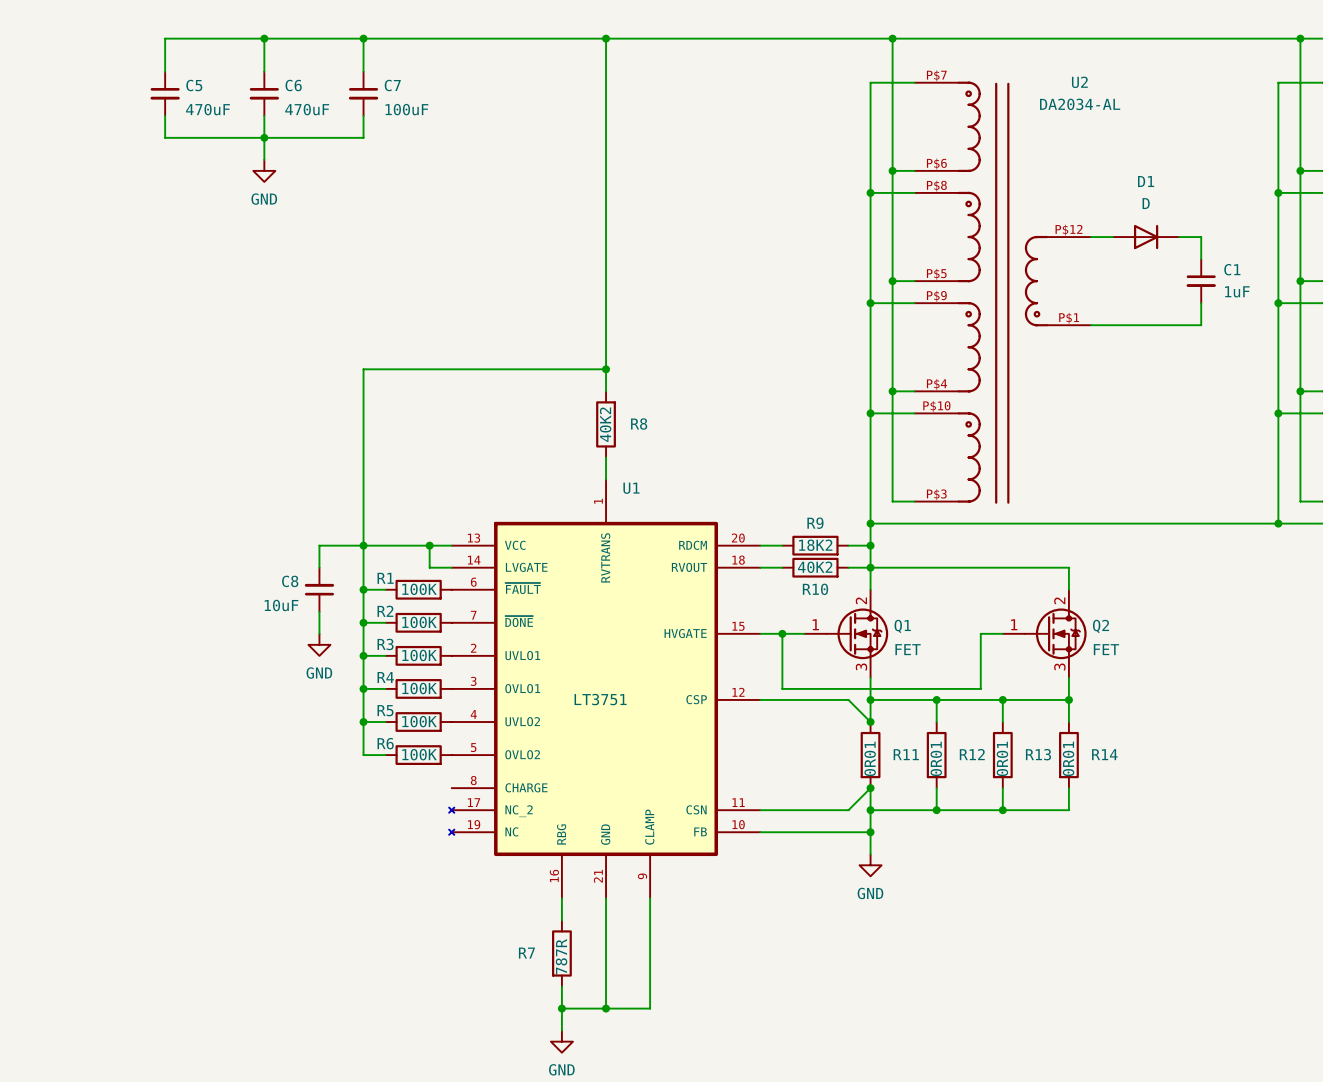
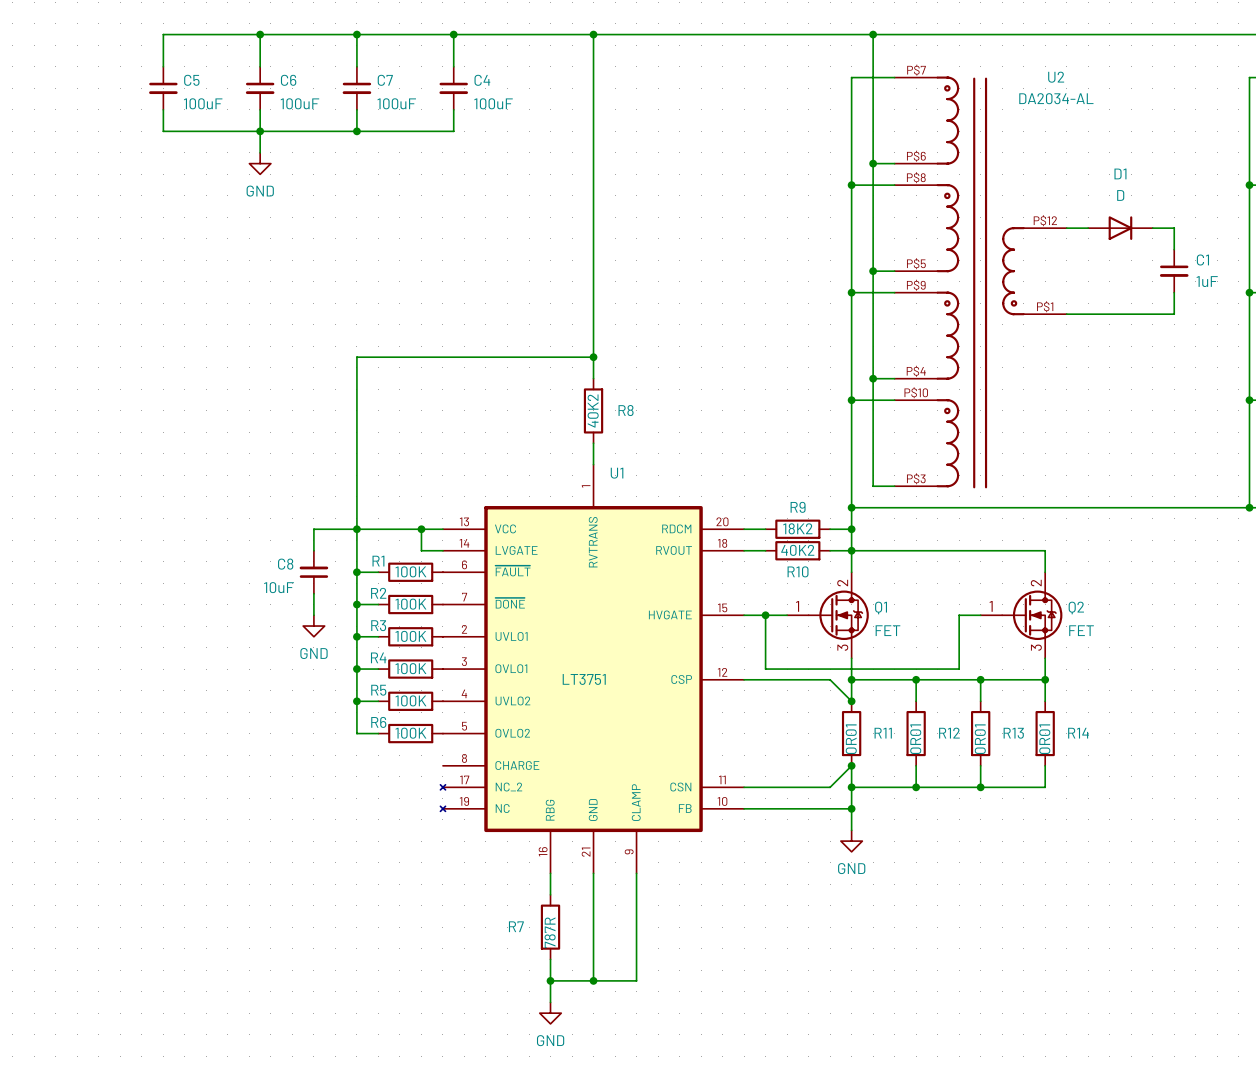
wire: none -> (453, 34) (453, 66)
junction: none -> (453, 34)
C4: none -> 100uF (453, 88)
C5 value: 470uF (207, 109) -> 100uF (203, 103)
C6 value: 470uF (307, 109) -> 100uF (299, 103)
wire: none -> (453, 109) (453, 131) (356, 131)
junction: none -> (356, 131)

